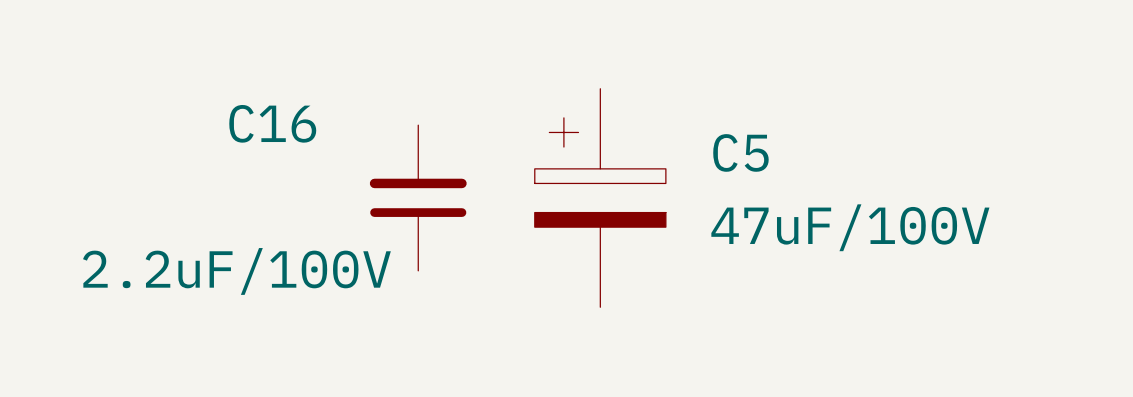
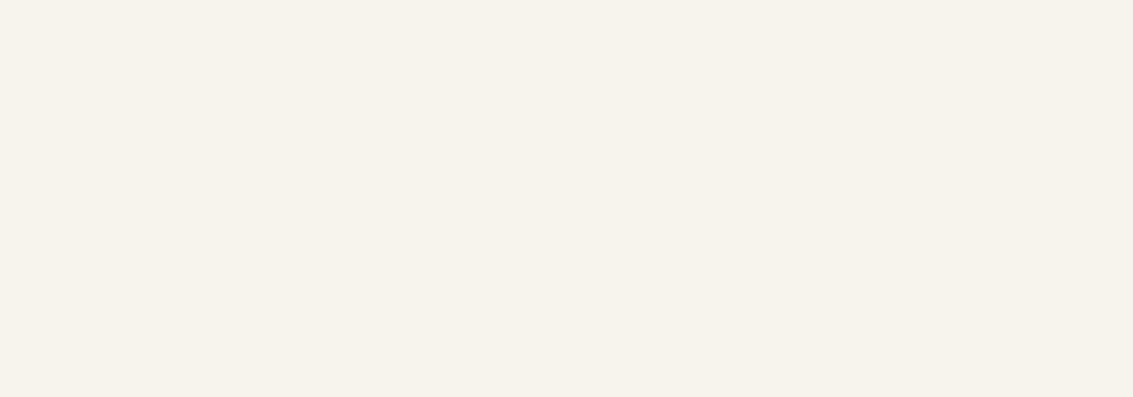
C16: 2.2uF/100V (418, 198) -> none
C5: 47uF/100V (600, 198) -> none

